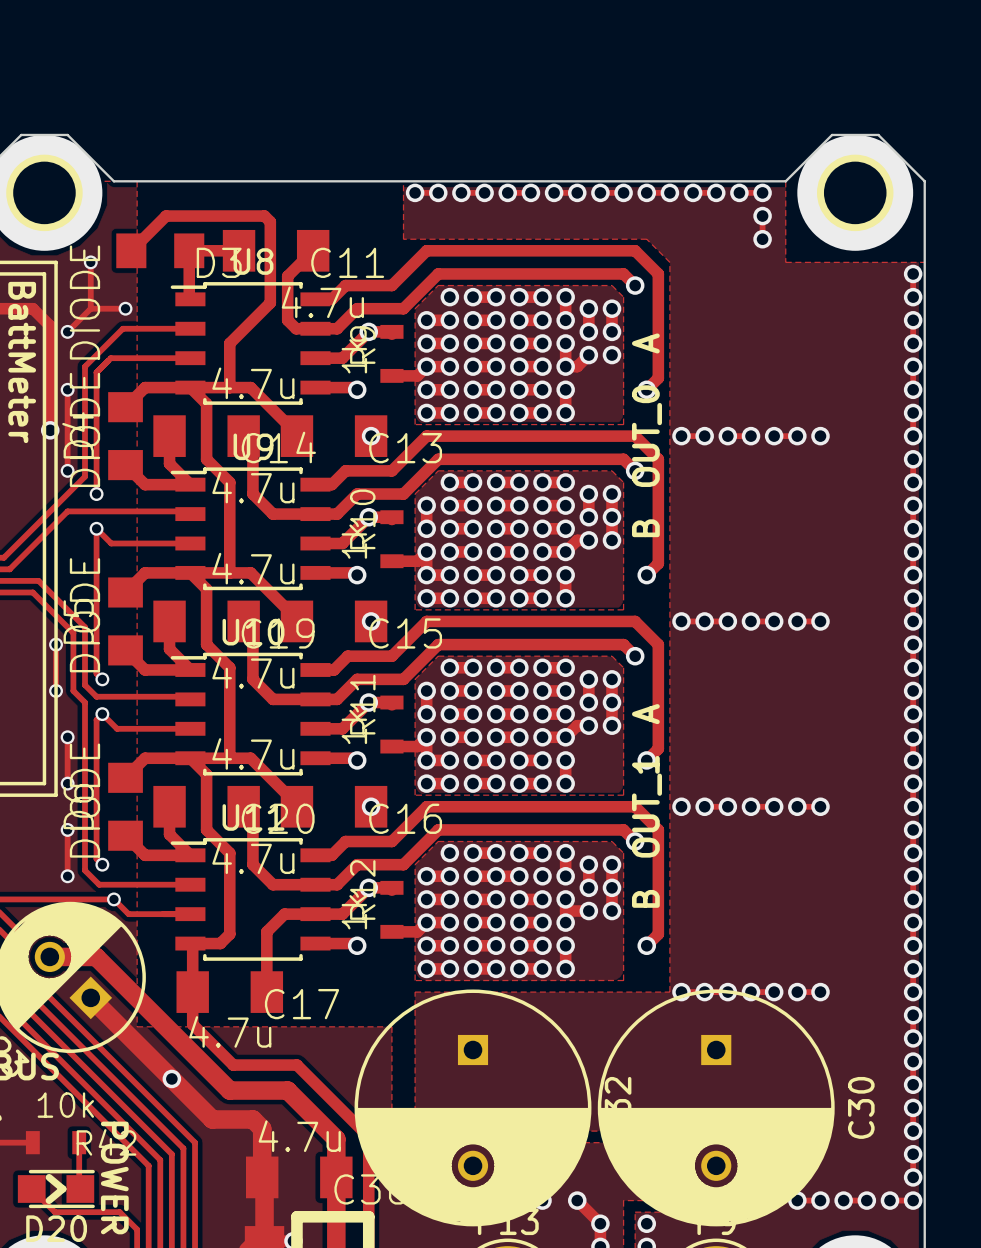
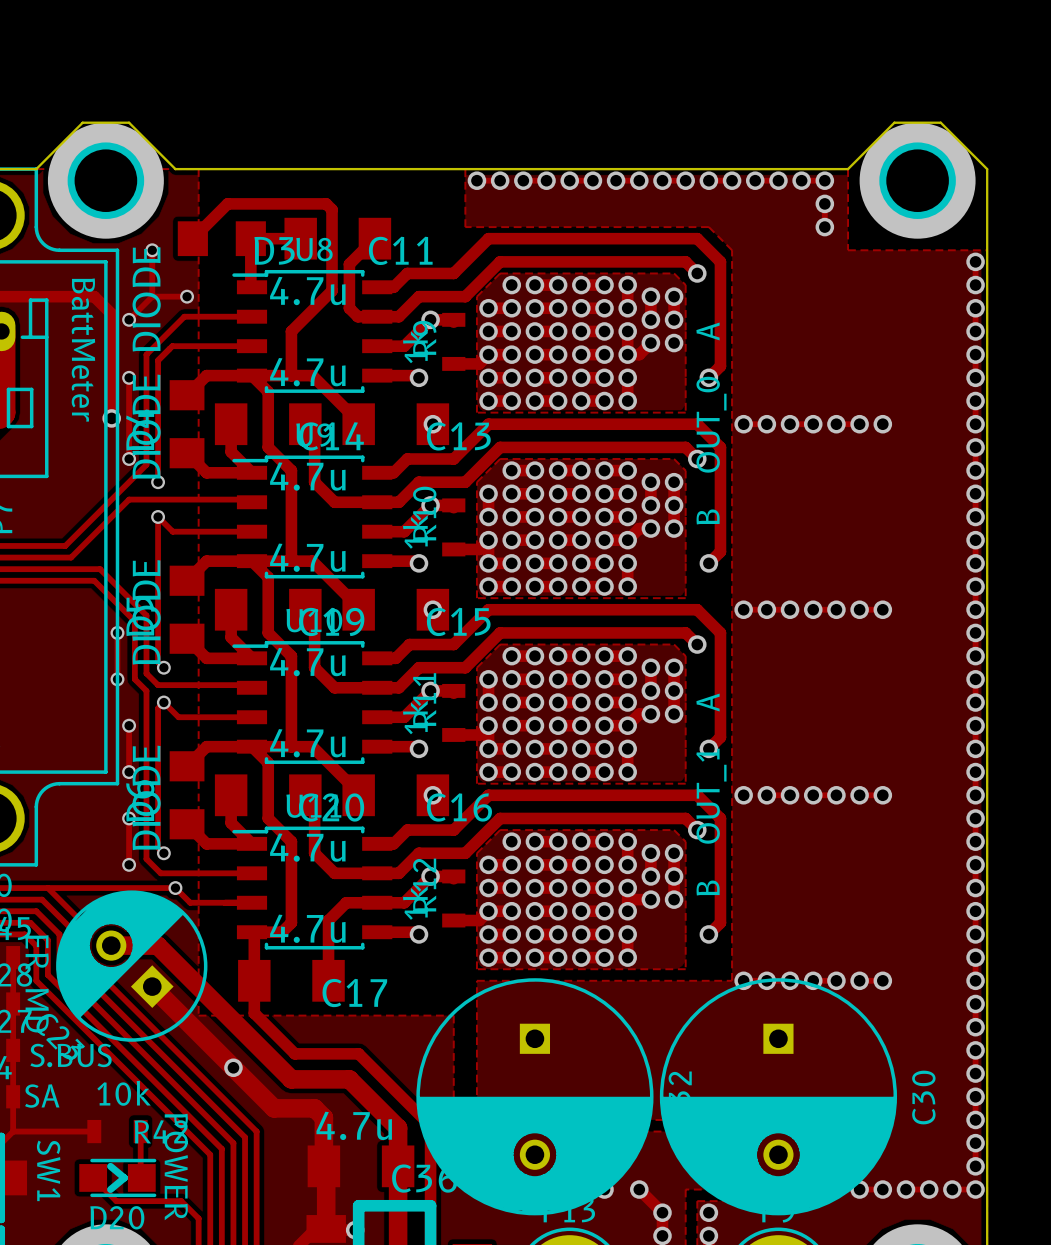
C11 value position: 4.7u (322, 302) -> 4.7u (307, 291)
C17 value position: 4.7u (230, 1031) -> 4.7u (307, 928)

